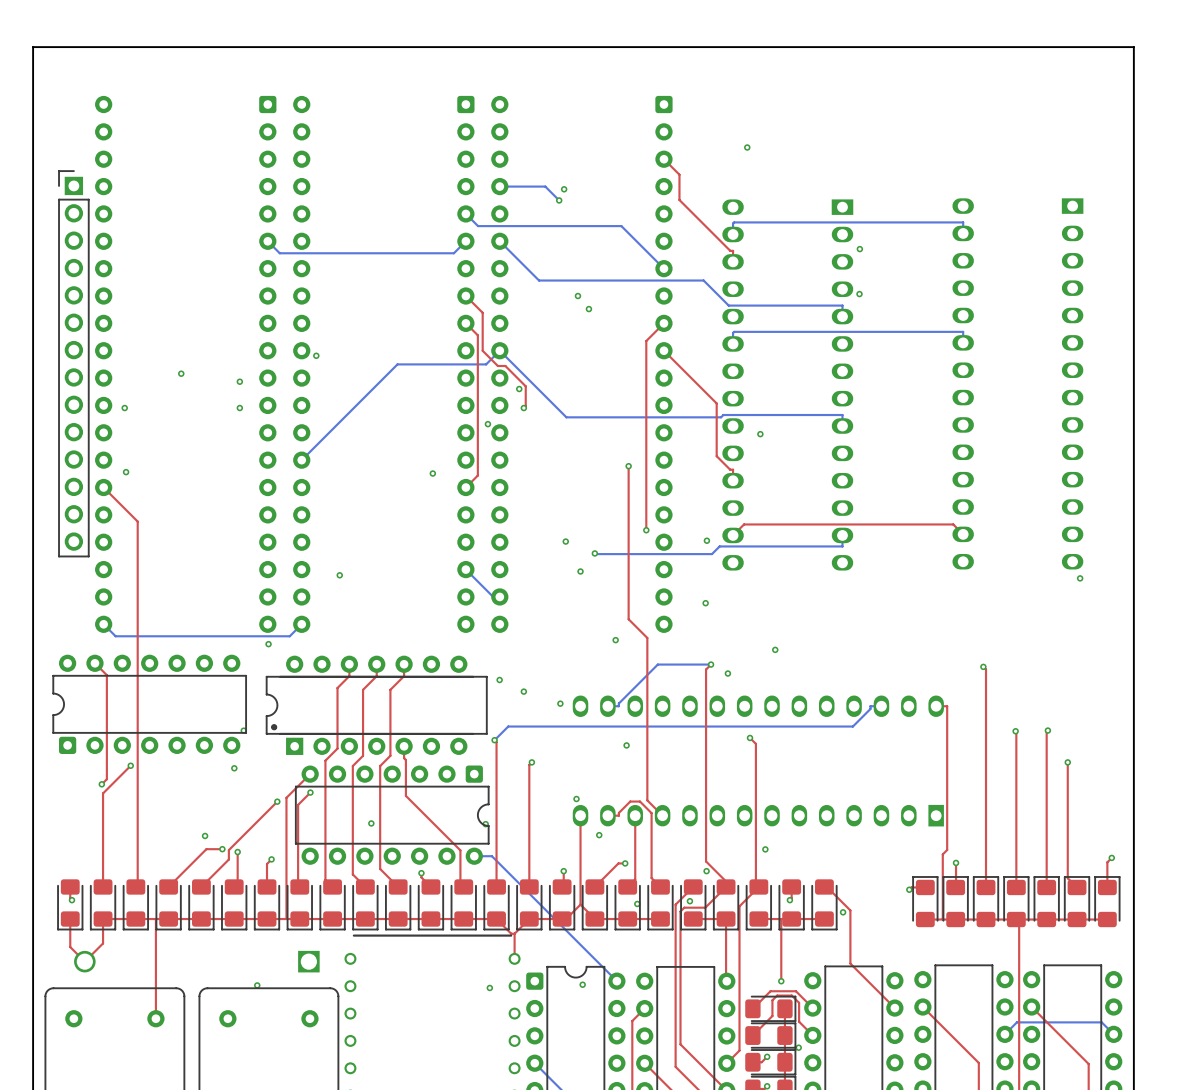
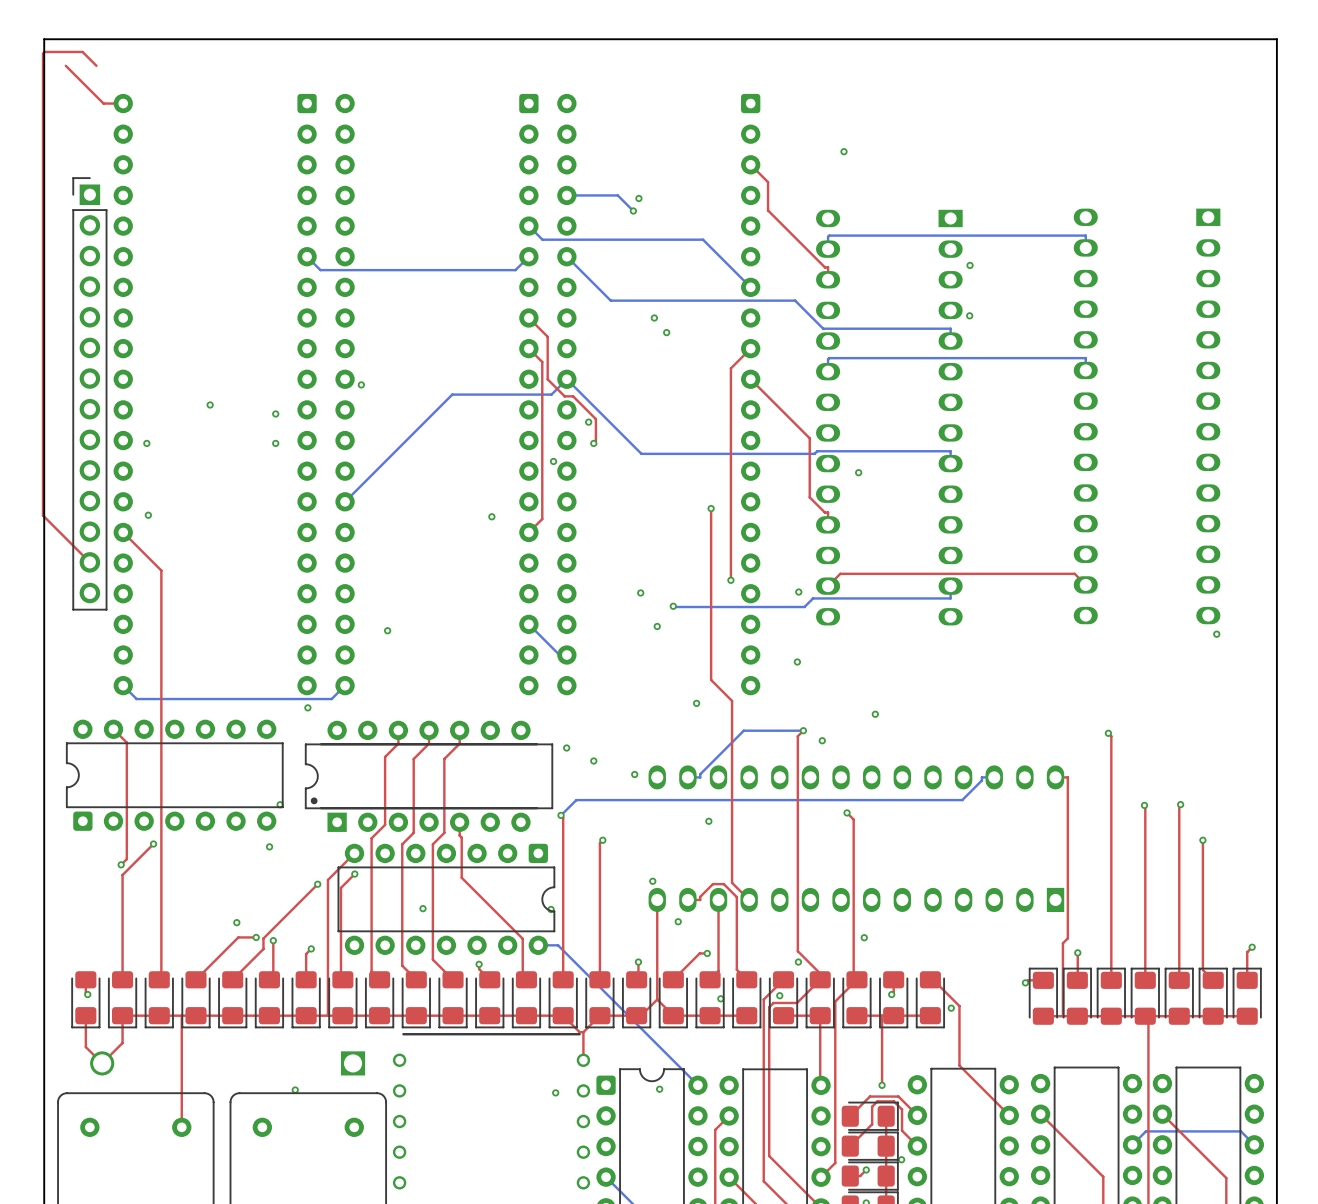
top track: none -> (65, 65) (103, 103) (123, 103)
top track: none -> (96, 65) (82, 51) (44, 51) (43, 53) (43, 515) (89, 562)

